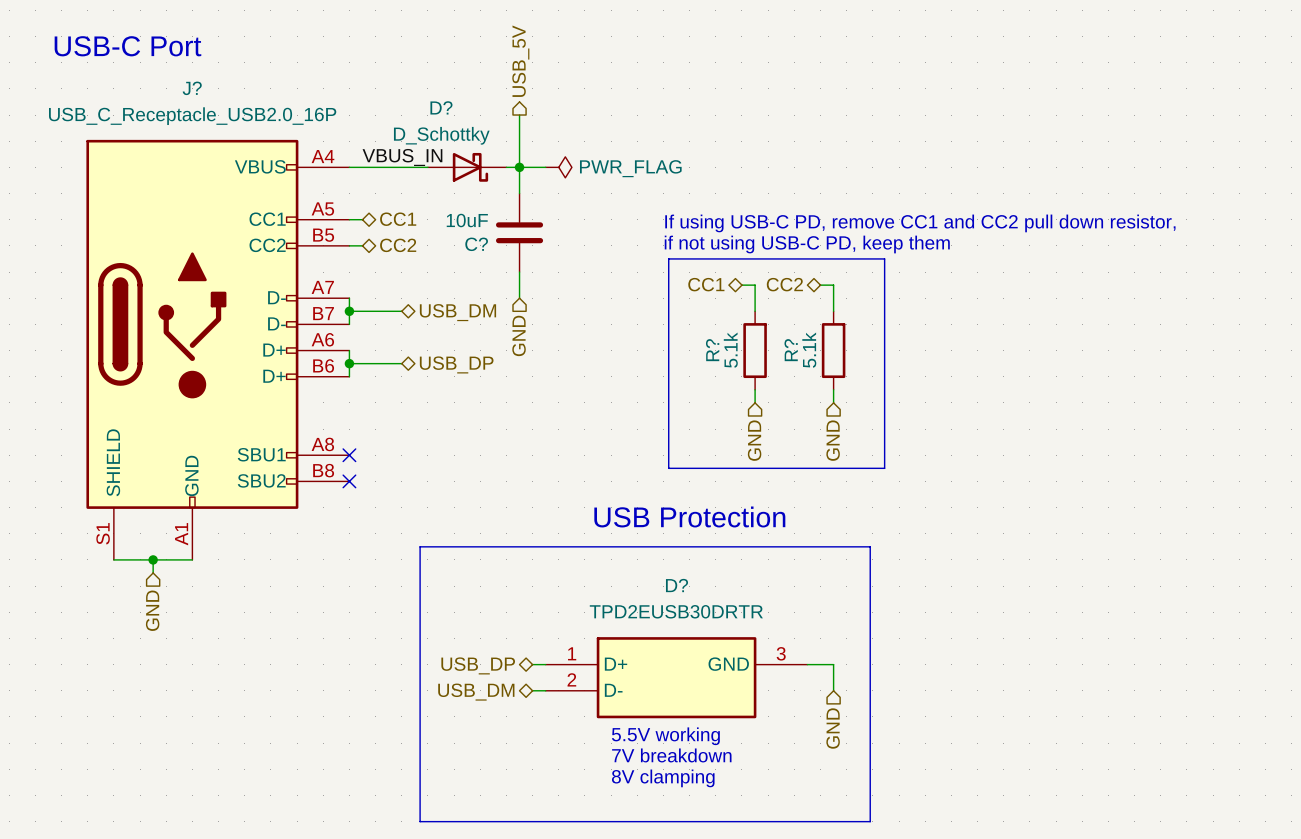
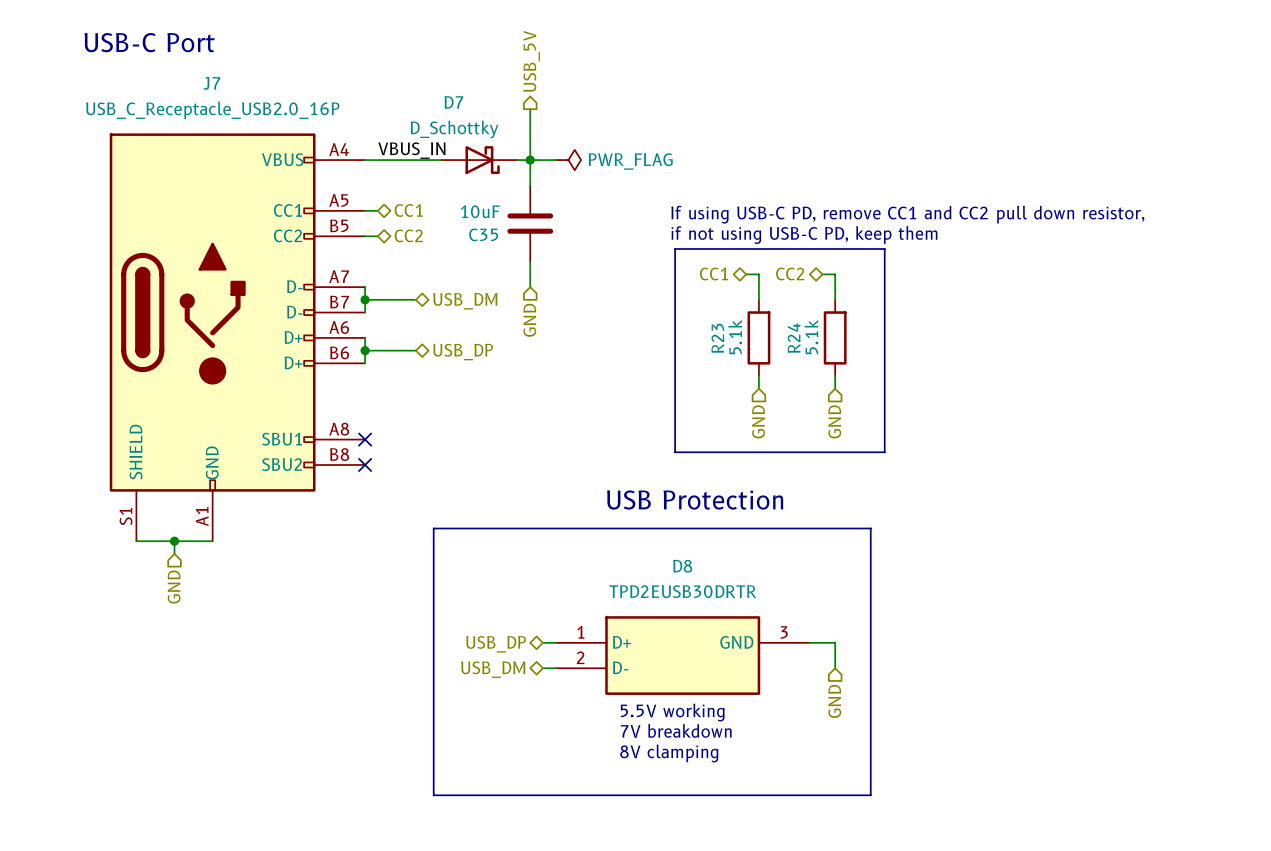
J? name: J? (192, 88) -> J7 (211, 83)
D? name: D? (441, 107) -> D7 (453, 102)
C? name: C? (476, 244) -> C35 (483, 234)
R? name: R? (712, 350) -> R23 (717, 338)
R? name: R? (791, 350) -> R24 (794, 338)
D? name: D? (676, 585) -> D8 (682, 566)

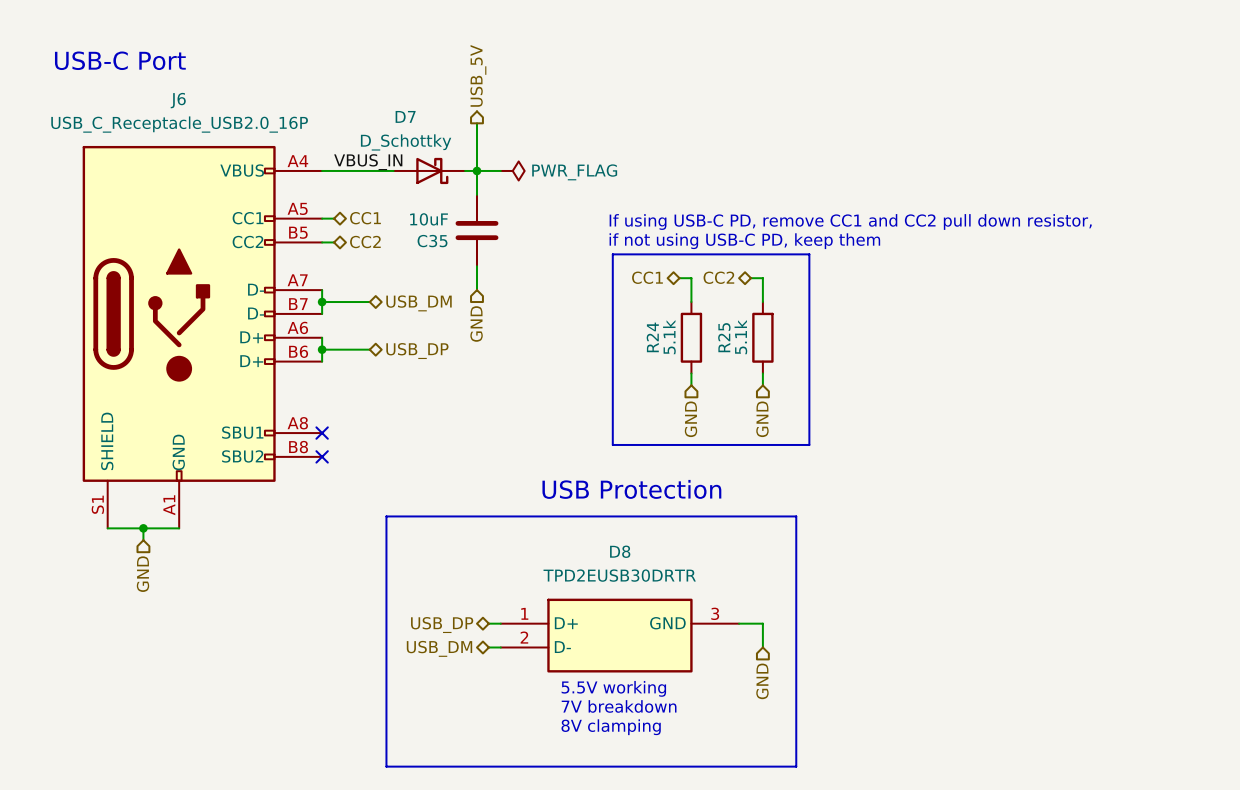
J7 name: J7 (211, 83) -> J6 (178, 100)
R23 name: R23 (717, 338) -> R24 (652, 337)
R24 name: R24 (794, 338) -> R25 (724, 337)

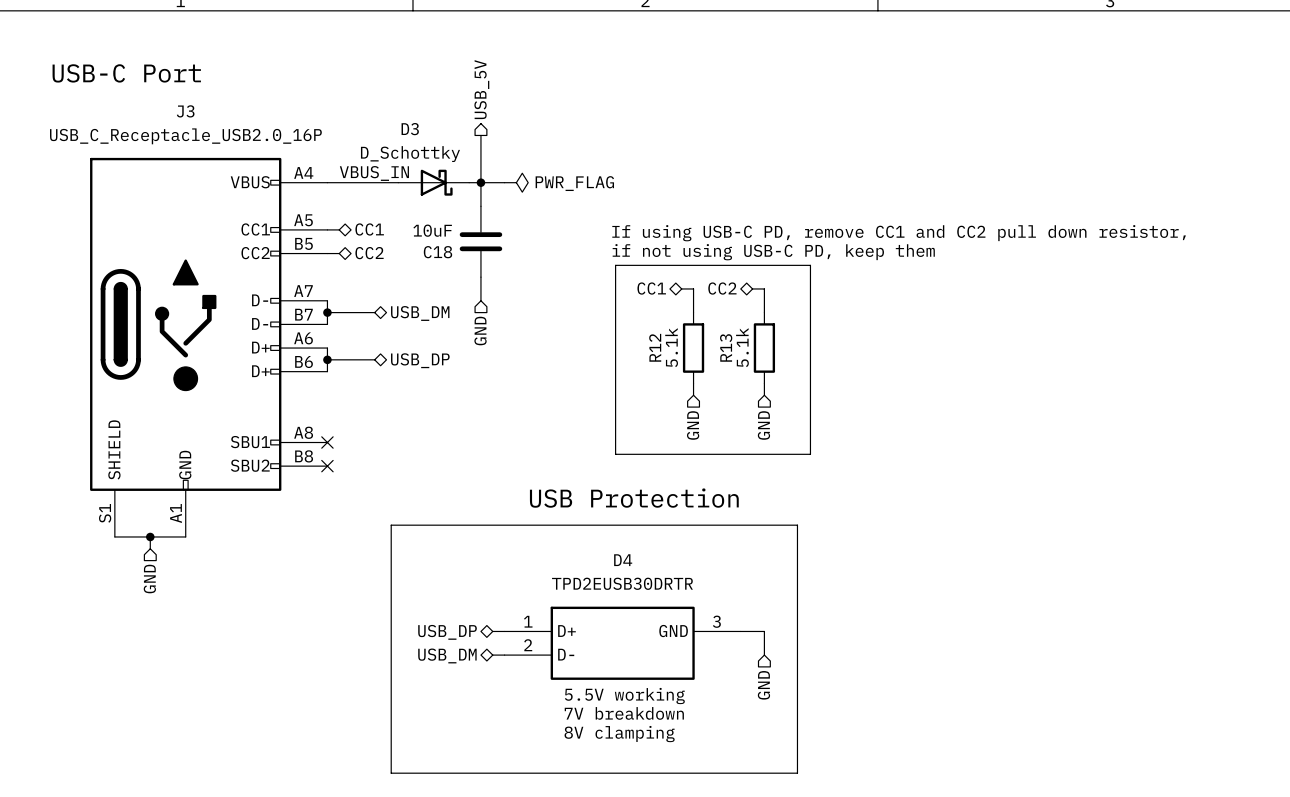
J6 name: J6 (178, 100) -> J3 (185, 111)
D7 name: D7 (405, 116) -> D3 (410, 129)
C35 name: C35 (432, 241) -> C18 (437, 252)
R24 name: R24 (652, 337) -> R12 (655, 347)
R25 name: R25 (724, 337) -> R13 (726, 347)
D8 name: D8 (620, 551) -> D4 (623, 560)

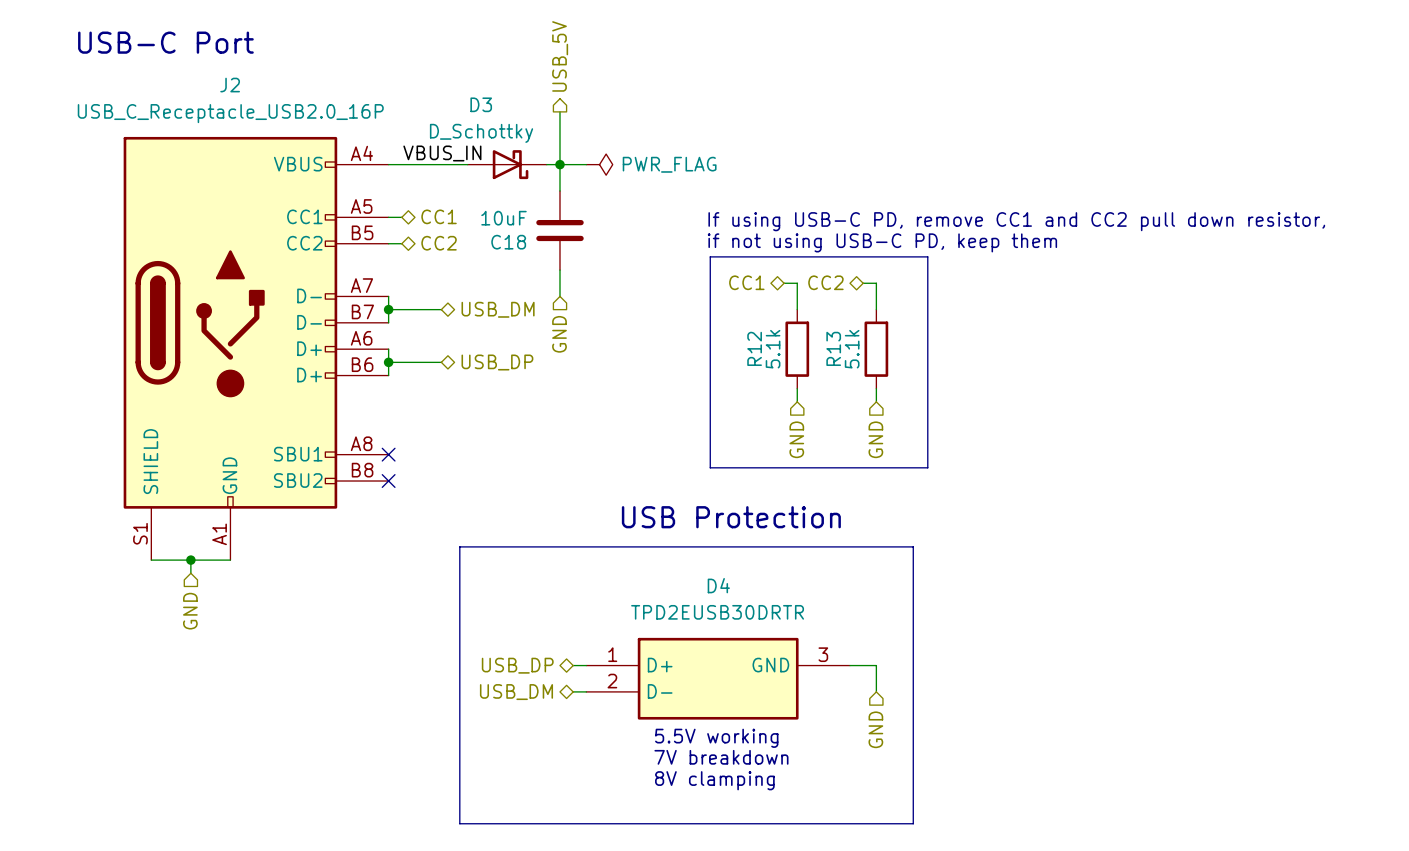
J3 name: J3 (185, 111) -> J2 (230, 85)

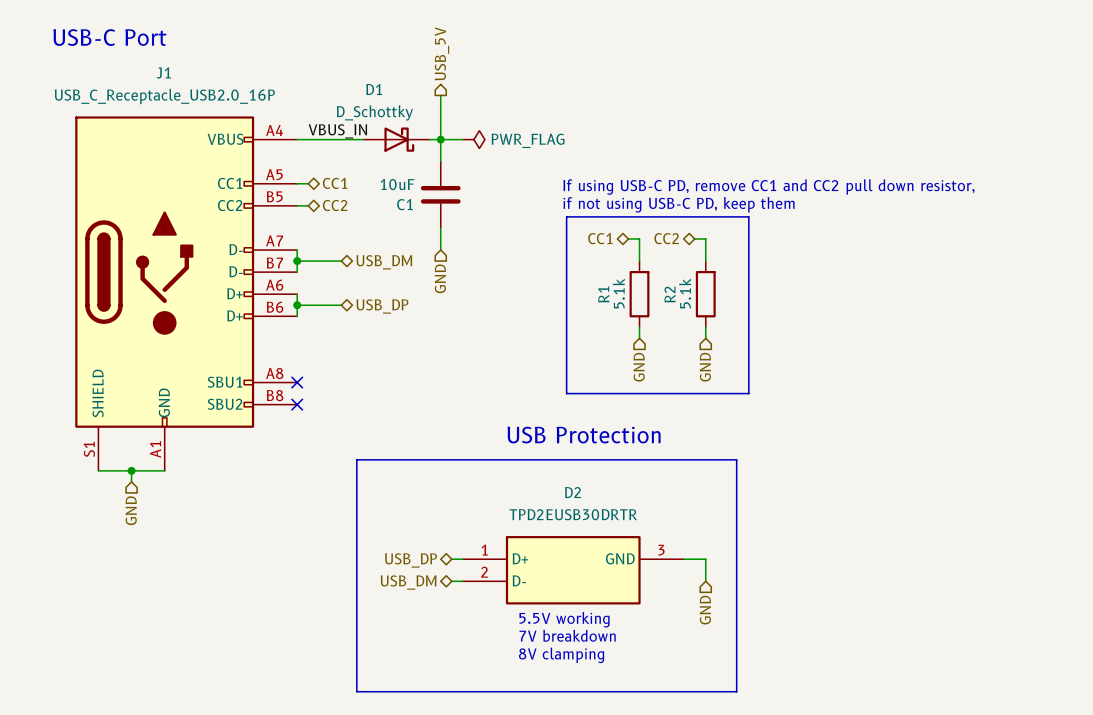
J2 name: J2 (230, 85) -> J1 (163, 73)
D3 name: D3 (481, 104) -> D1 (374, 89)
C18 name: C18 (508, 242) -> C1 (405, 204)
R12 name: R12 (754, 348) -> R1 (603, 294)
R13 name: R13 (833, 348) -> R2 (670, 294)
D4 name: D4 (718, 585) -> D2 (572, 492)

